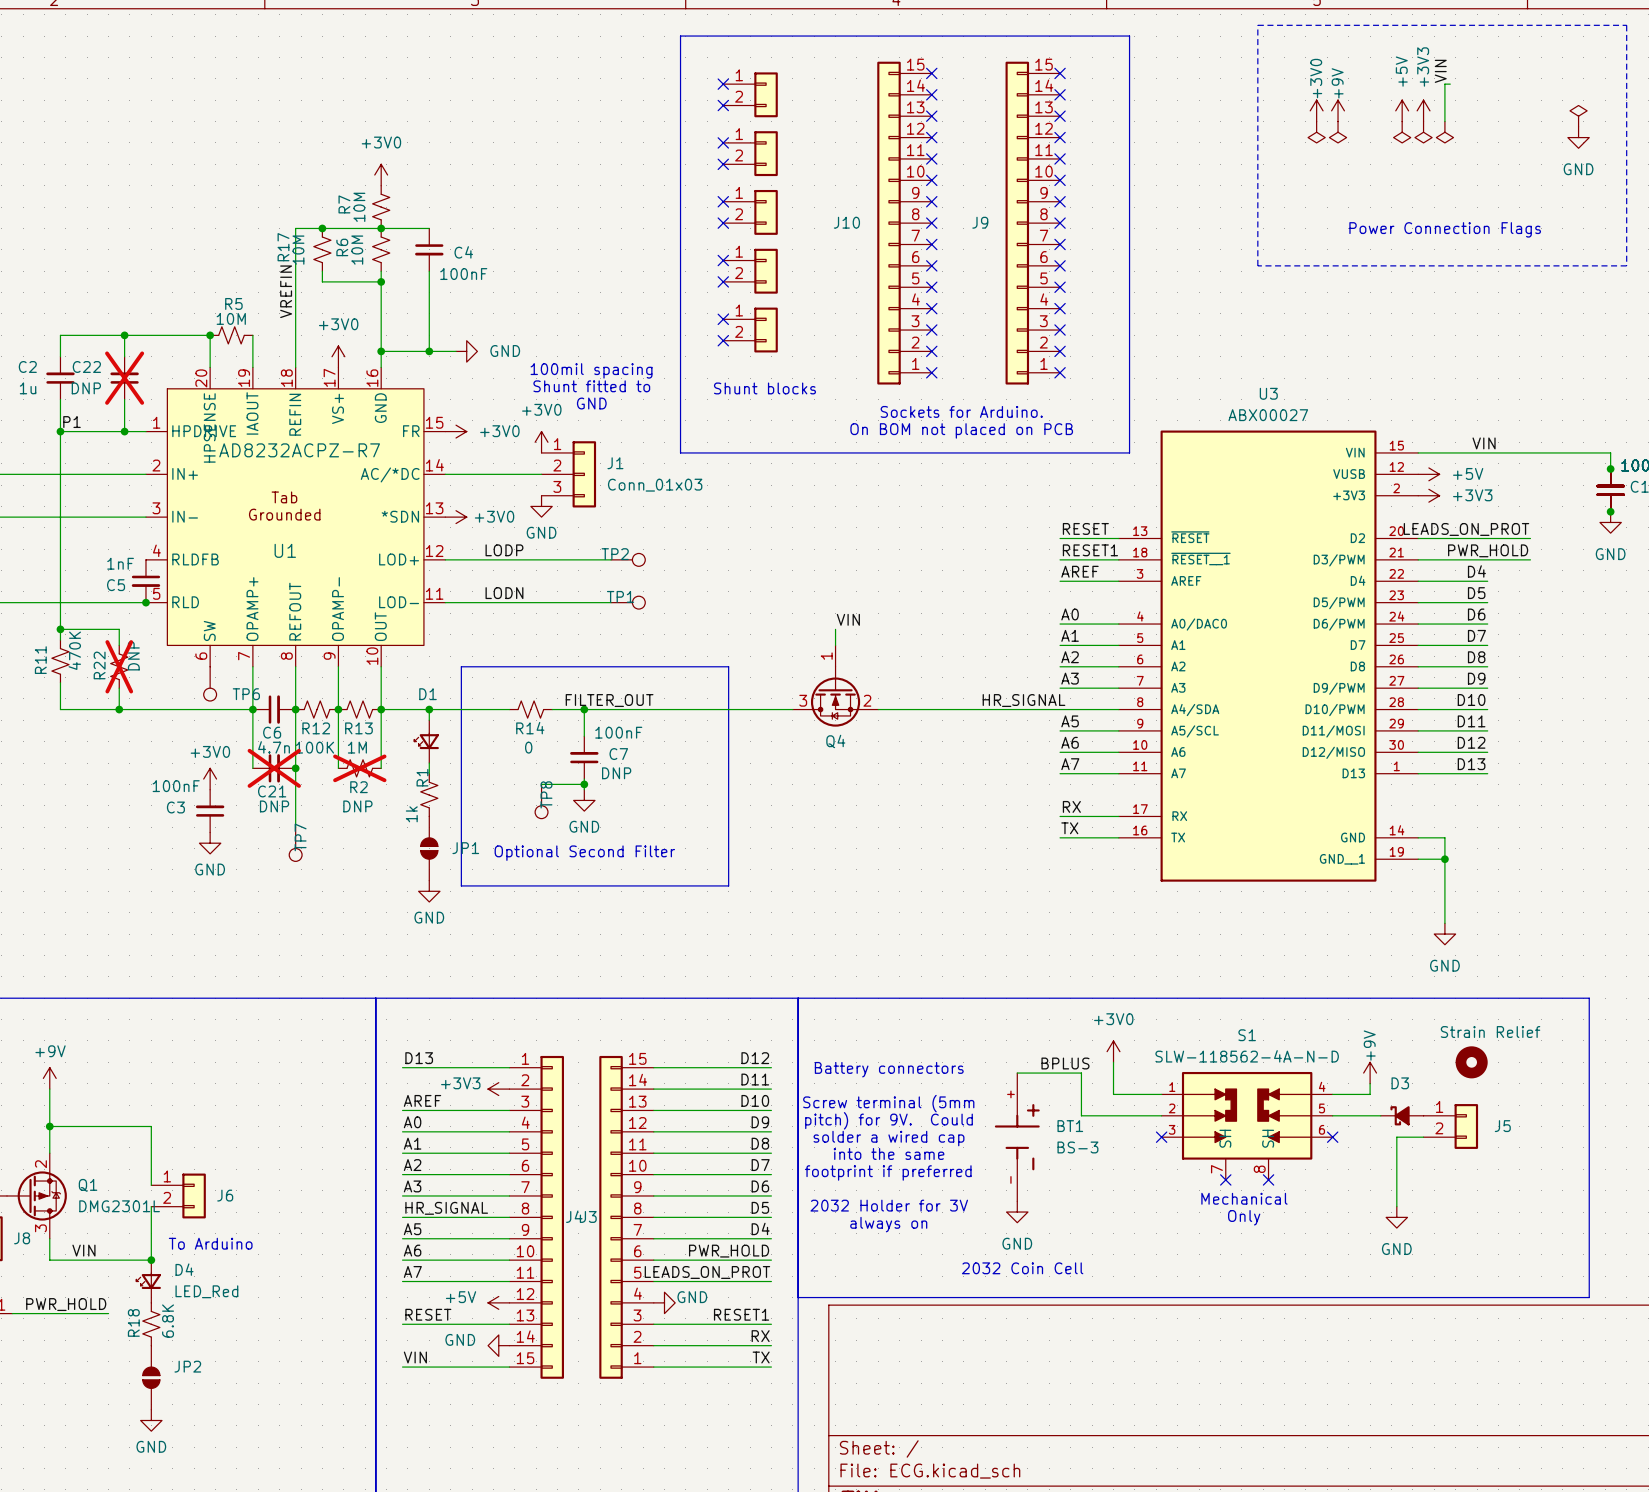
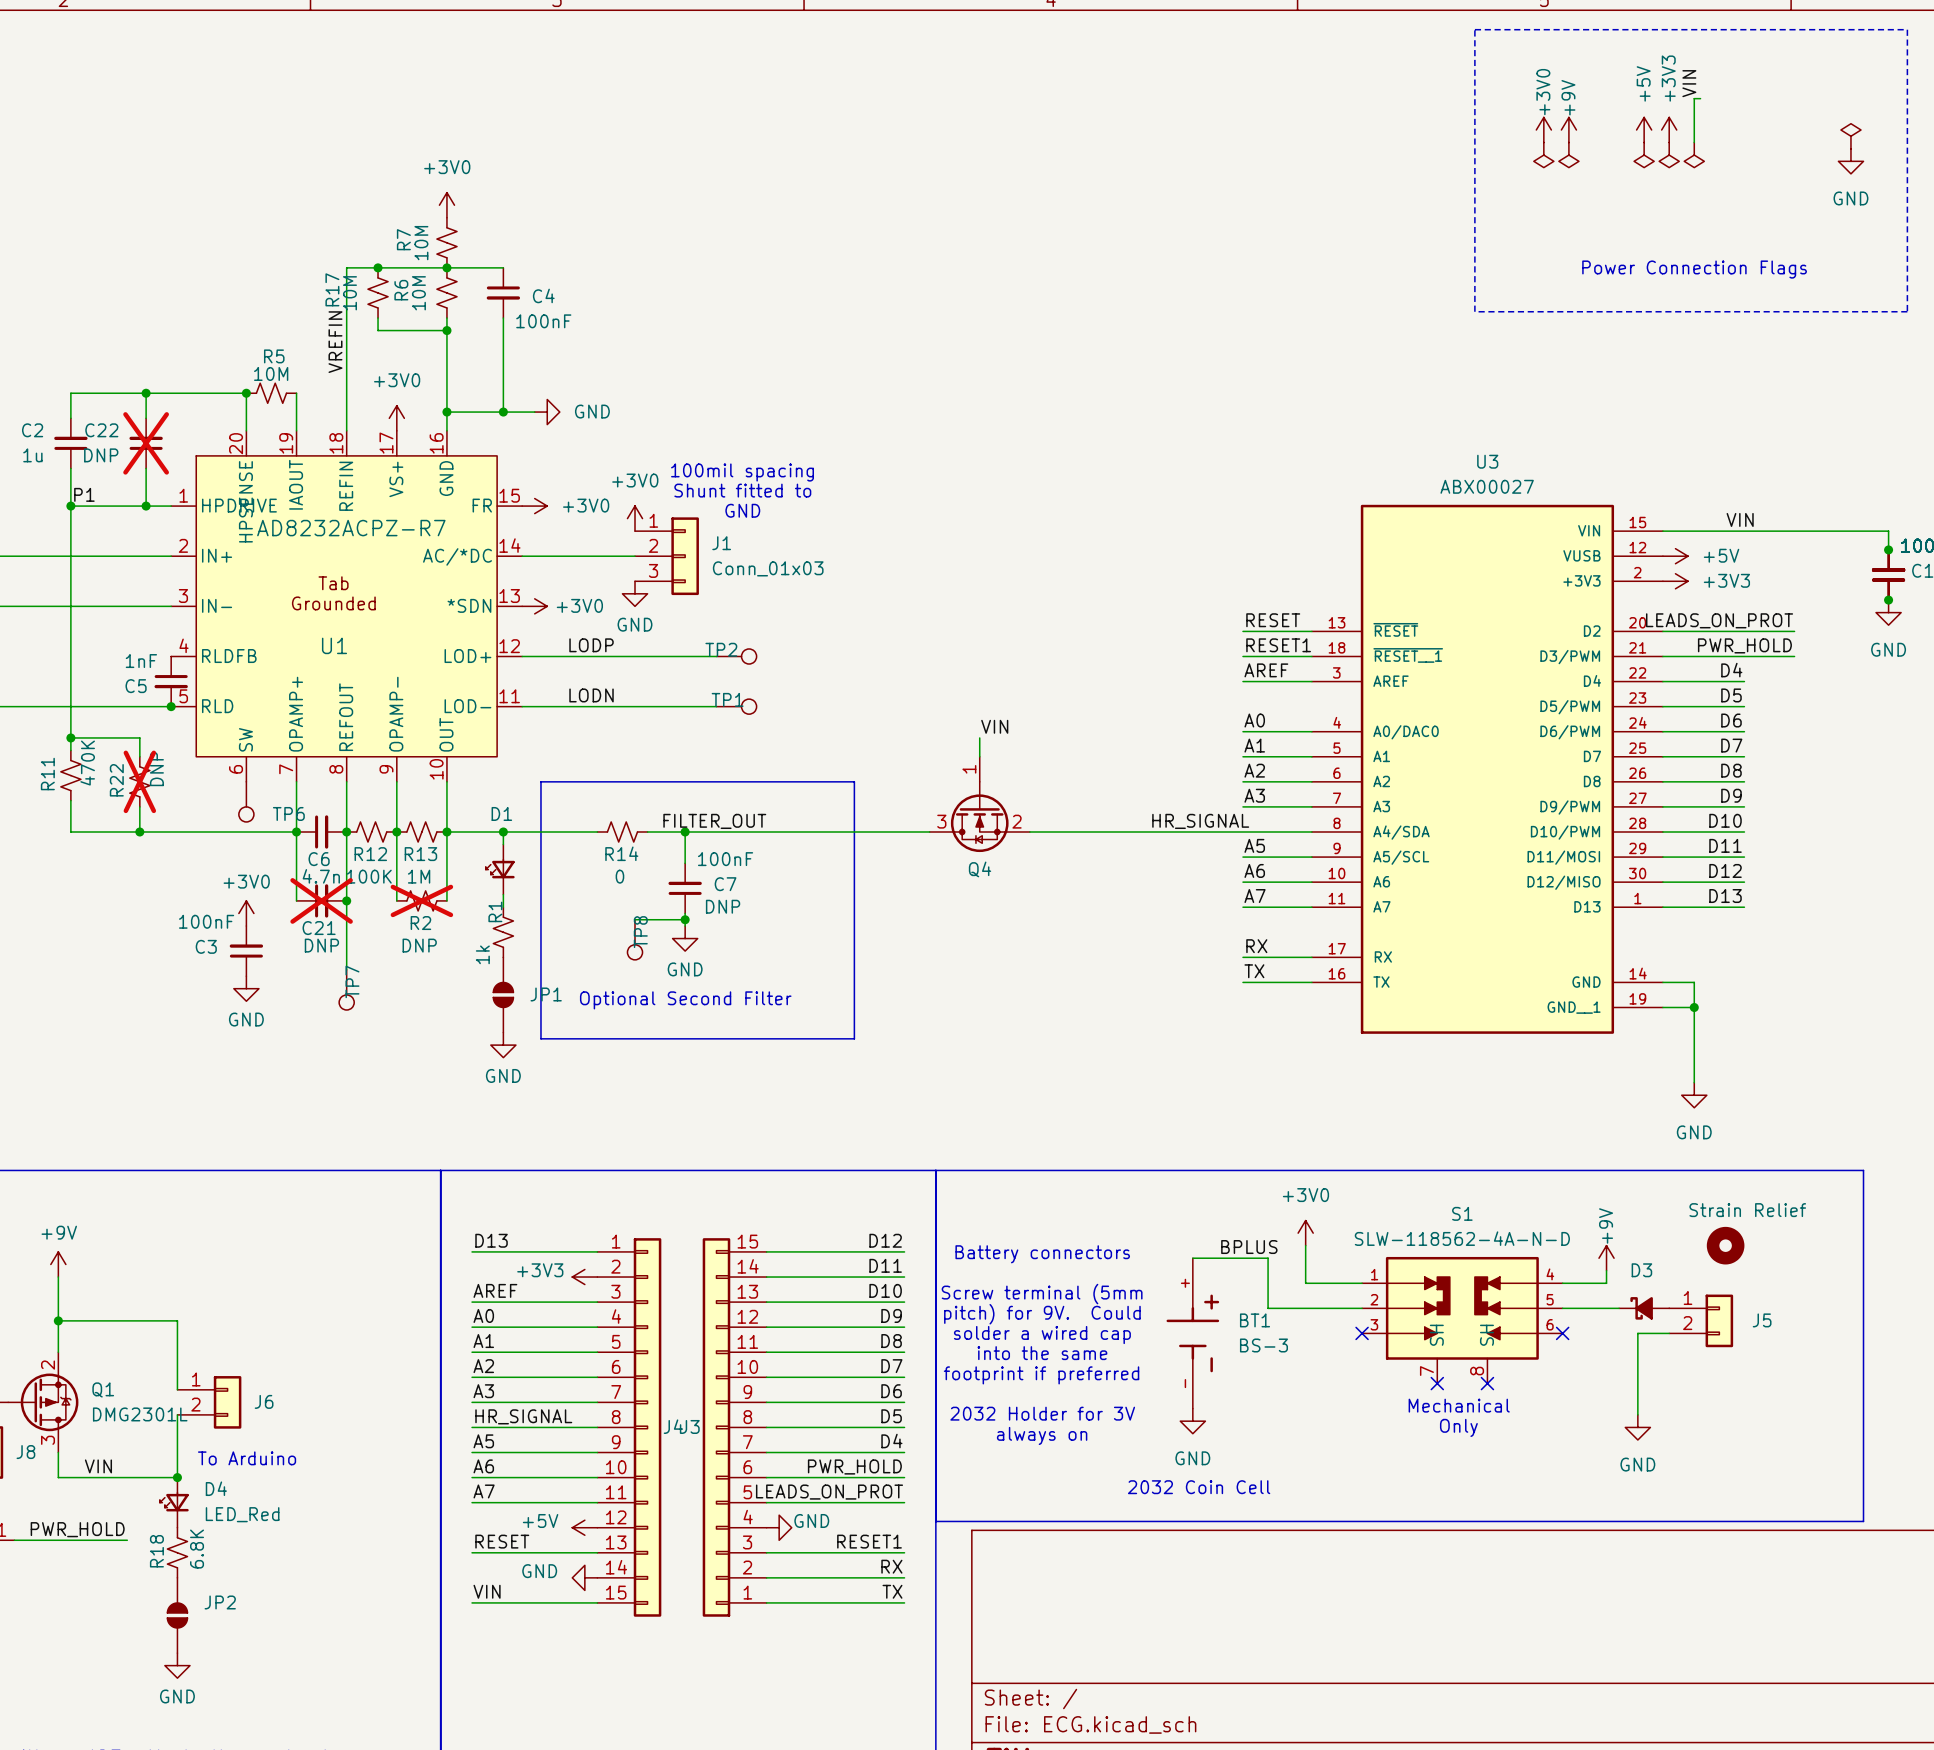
line: (680, 36) (1129, 36) (1129, 452) (680, 452) (680, 36) -> none
no-connect mark: (931, 73) -> none
no-connect mark: (1060, 73) -> none
no-connect mark: (723, 84) -> none
part: (750, 94) -> none
no-connect mark: (931, 94) -> none
no-connect mark: (1060, 94) -> none
no-connect mark: (723, 105) -> none
no-connect mark: (931, 116) -> none
no-connect mark: (1060, 116) -> none
no-connect mark: (931, 137) -> none
no-connect mark: (1060, 137) -> none
no-connect mark: (723, 142) -> none
part: (750, 153) -> none
no-connect mark: (931, 158) -> none
no-connect mark: (1060, 158) -> none
no-connect mark: (723, 164) -> none
no-connect mark: (931, 180) -> none
no-connect mark: (1060, 180) -> none
no-connect mark: (723, 201) -> none
no-connect mark: (931, 201) -> none
no-connect mark: (1060, 201) -> none
part: (750, 212) -> none
no-connect mark: (723, 223) -> none
J10: (904, 223) -> none
no-connect mark: (931, 223) -> none
J9: (1032, 223) -> none
no-connect mark: (1060, 223) -> none
no-connect mark: (931, 244) -> none
no-connect mark: (1060, 244) -> none
no-connect mark: (723, 260) -> none
no-connect mark: (931, 265) -> none
no-connect mark: (1060, 265) -> none
part: (750, 271) -> none
no-connect mark: (723, 281) -> none
no-connect mark: (931, 287) -> none
no-connect mark: (1060, 287) -> none
no-connect mark: (931, 308) -> none
no-connect mark: (1060, 308) -> none
no-connect mark: (723, 319) -> none
part: (750, 330) -> none
no-connect mark: (931, 330) -> none
no-connect mark: (1060, 330) -> none
no-connect mark: (723, 340) -> none
no-connect mark: (931, 351) -> none
no-connect mark: (1060, 351) -> none
text position: 100mil spacing (591, 370) -> 100mil spacing (742, 472)
no-connect mark: (931, 372) -> none
no-connect mark: (1060, 372) -> none
text position: Shunt fitted to (591, 386) -> Shunt fitted to (742, 490)
text: Shunt blocks (764, 388) -> none
text position: GND (591, 403) -> GND (742, 510)
text: Sockets for Arduino. (961, 411) -> none
text: On BOM not placed on PCB (961, 430) -> none

